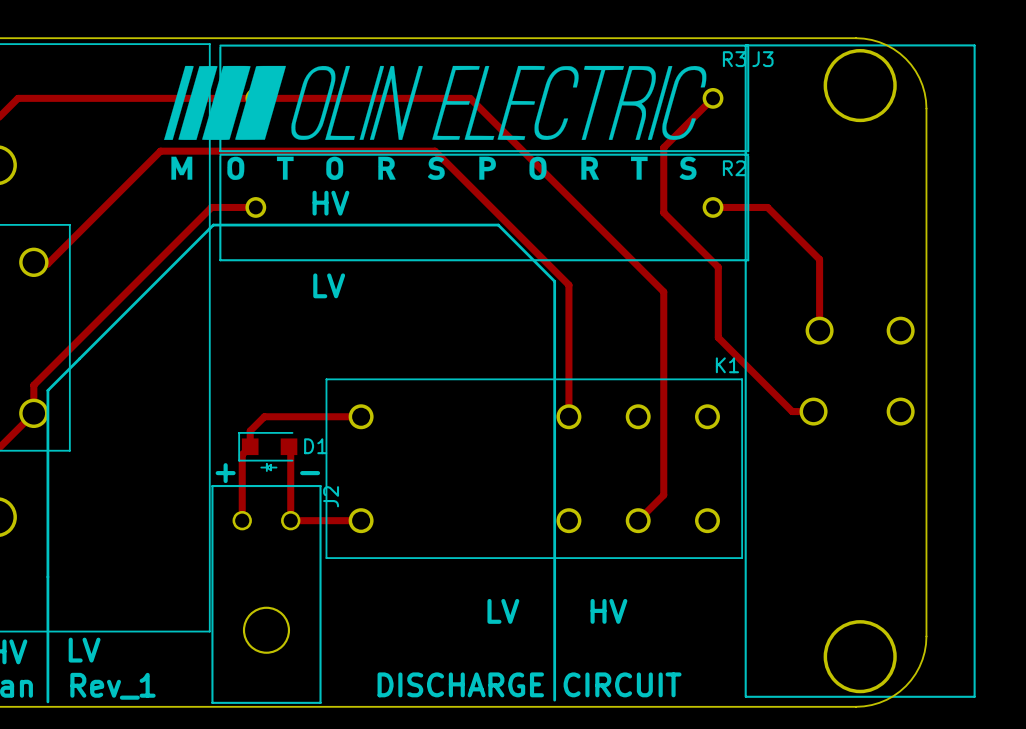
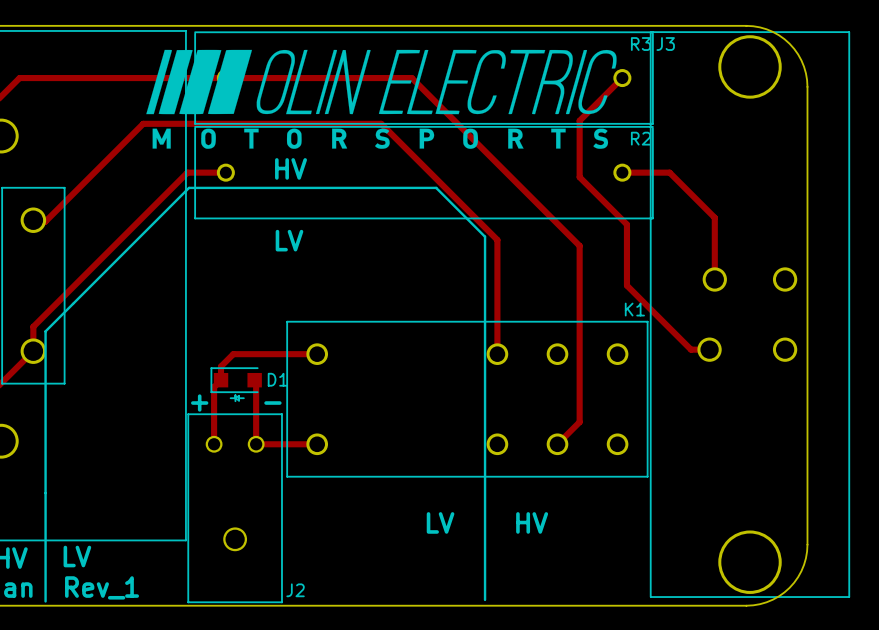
J2 footprint: [211, 484, 322, 705] -> [187, 413, 283, 604]
J2 name rotation: 0° (331, 496) -> 90° clockwise (295, 590)
J2 name position: J2 (331, 496) -> J2 (295, 590)
text: DISCHARGE CIRCUIT (529, 684) -> none

